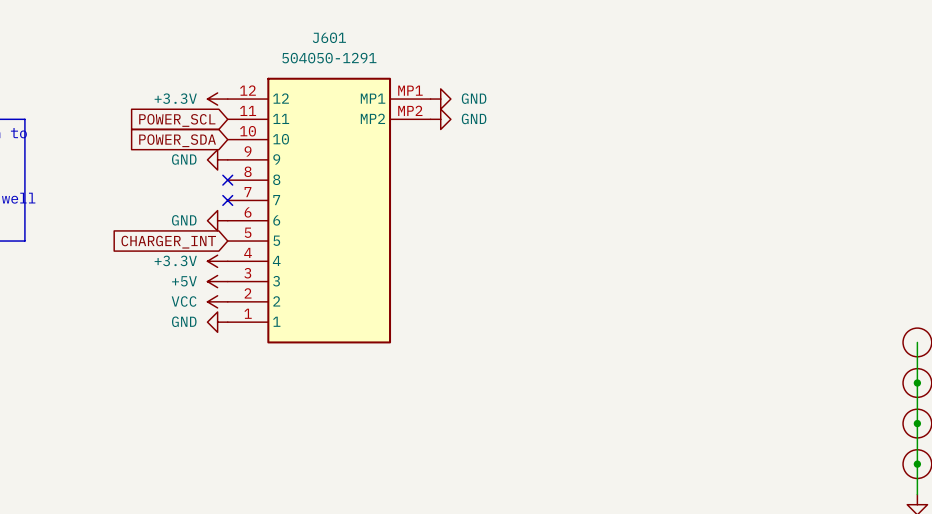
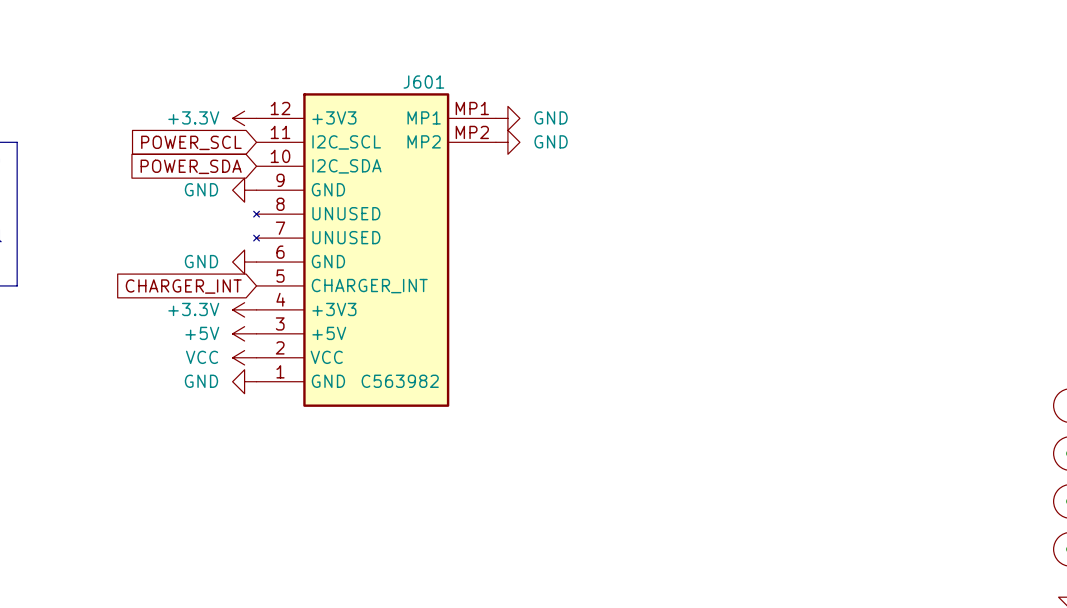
J601 name position: J601 (329, 37) -> J601 (423, 82)
J601 value: 504050-1291 (329, 58) -> none
J601 symbol: [227, 77, 431, 344] -> [253, 93, 496, 407]
no-connect mark: (227, 180) -> none
no-connect mark: (227, 200) -> none
J601 text: none -> C563982 (400, 381)

